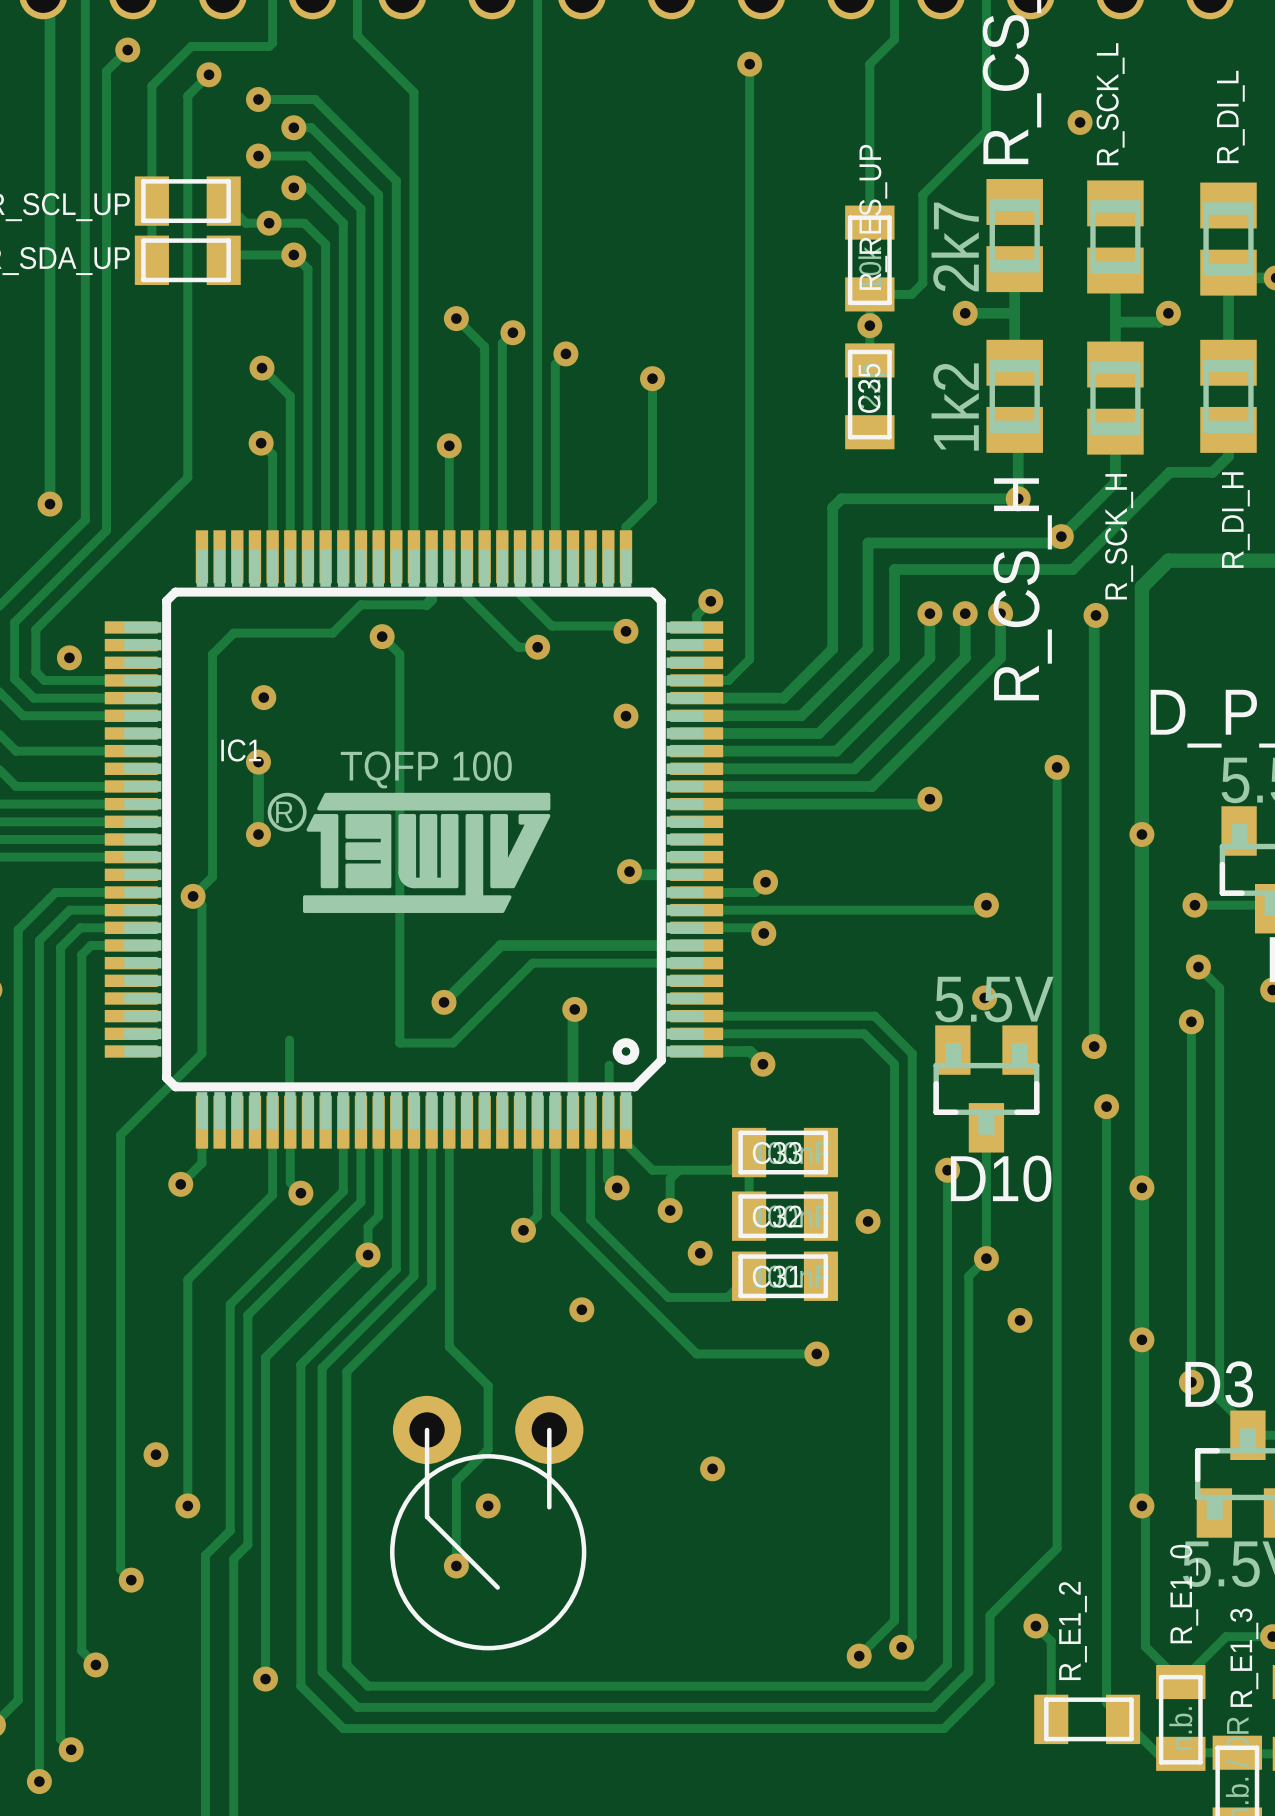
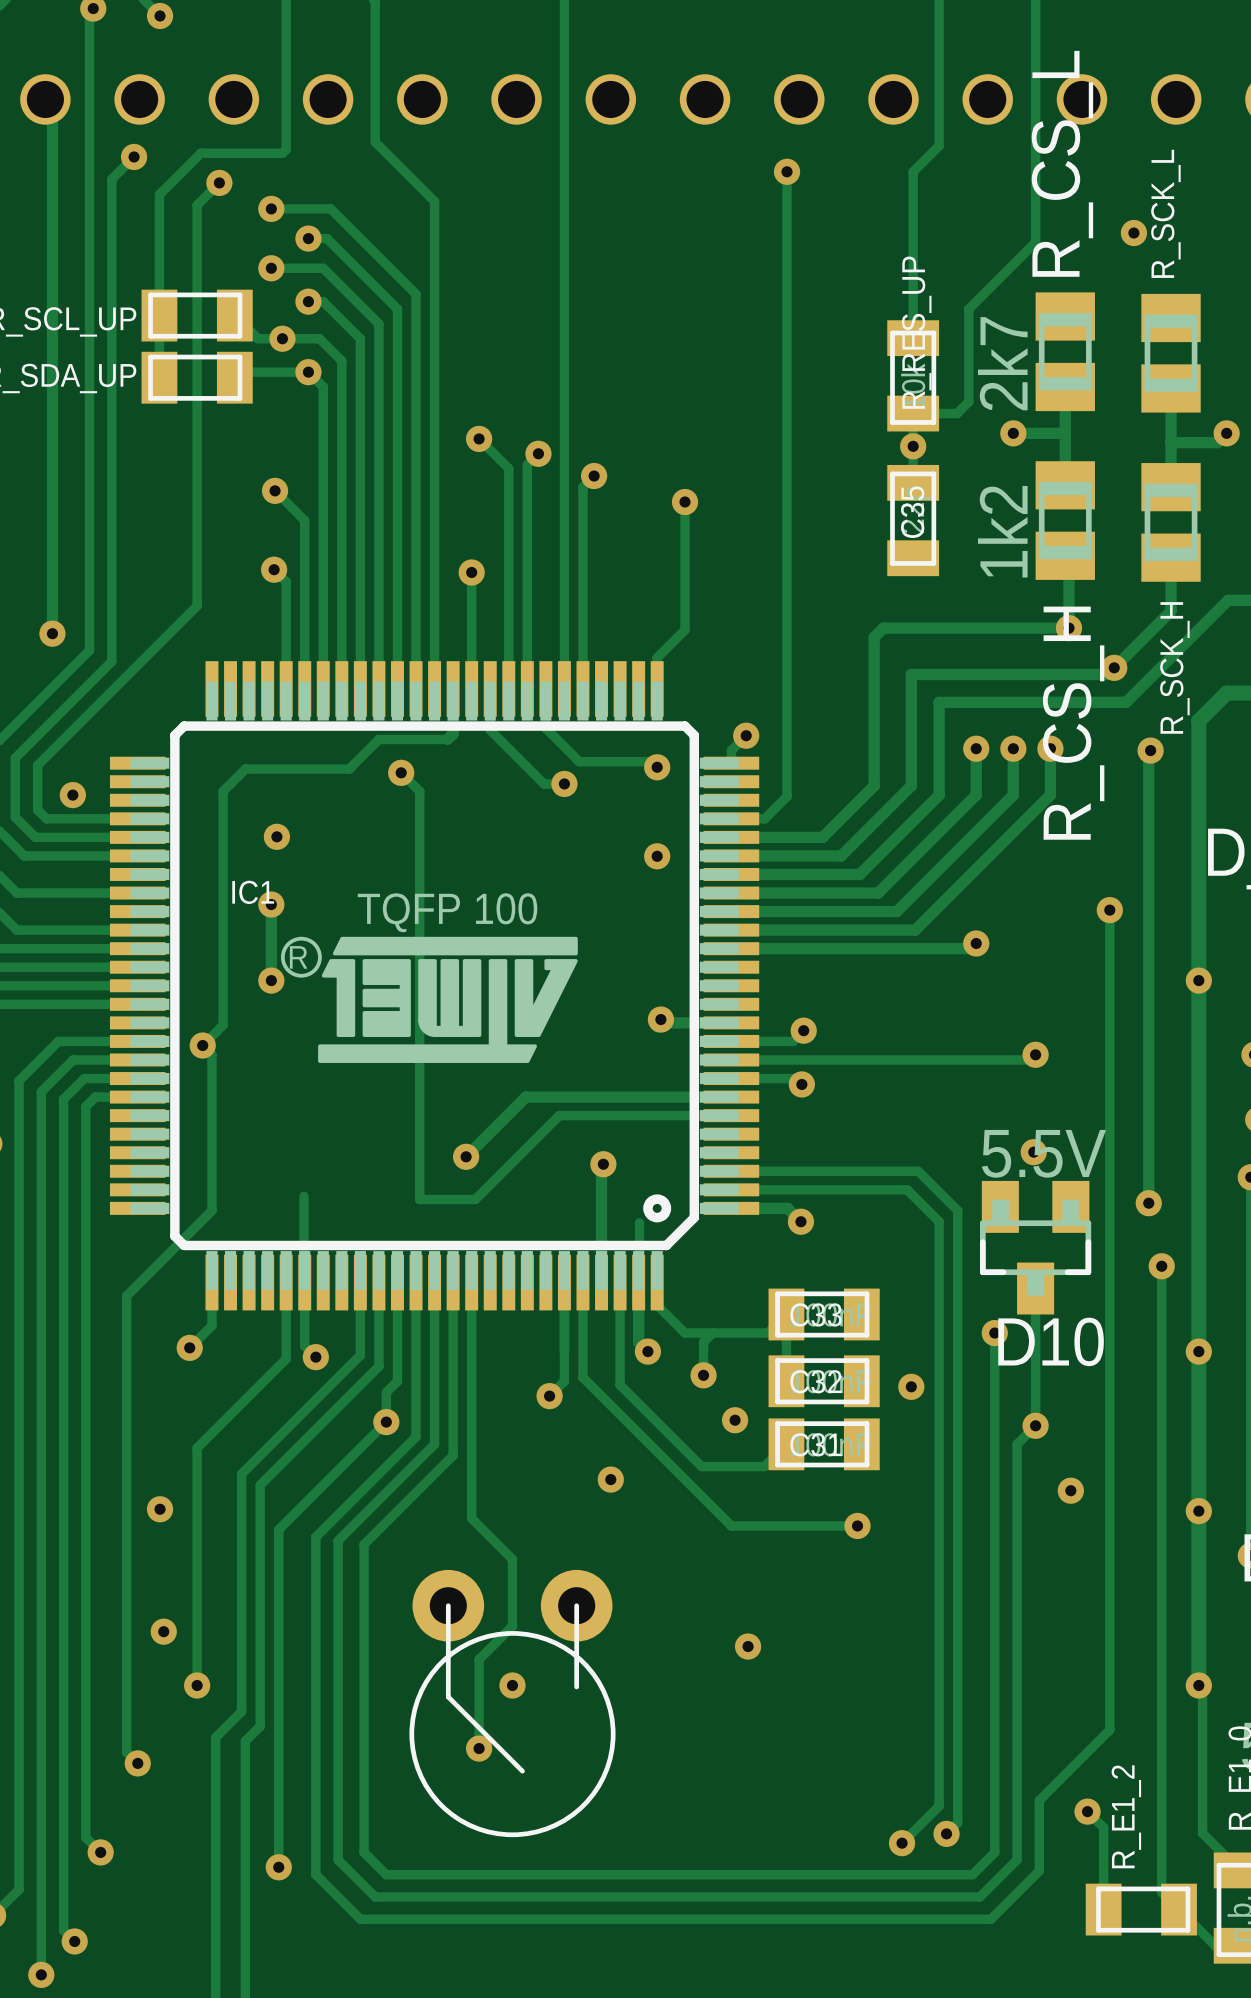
via: none -> (160, 1509)

